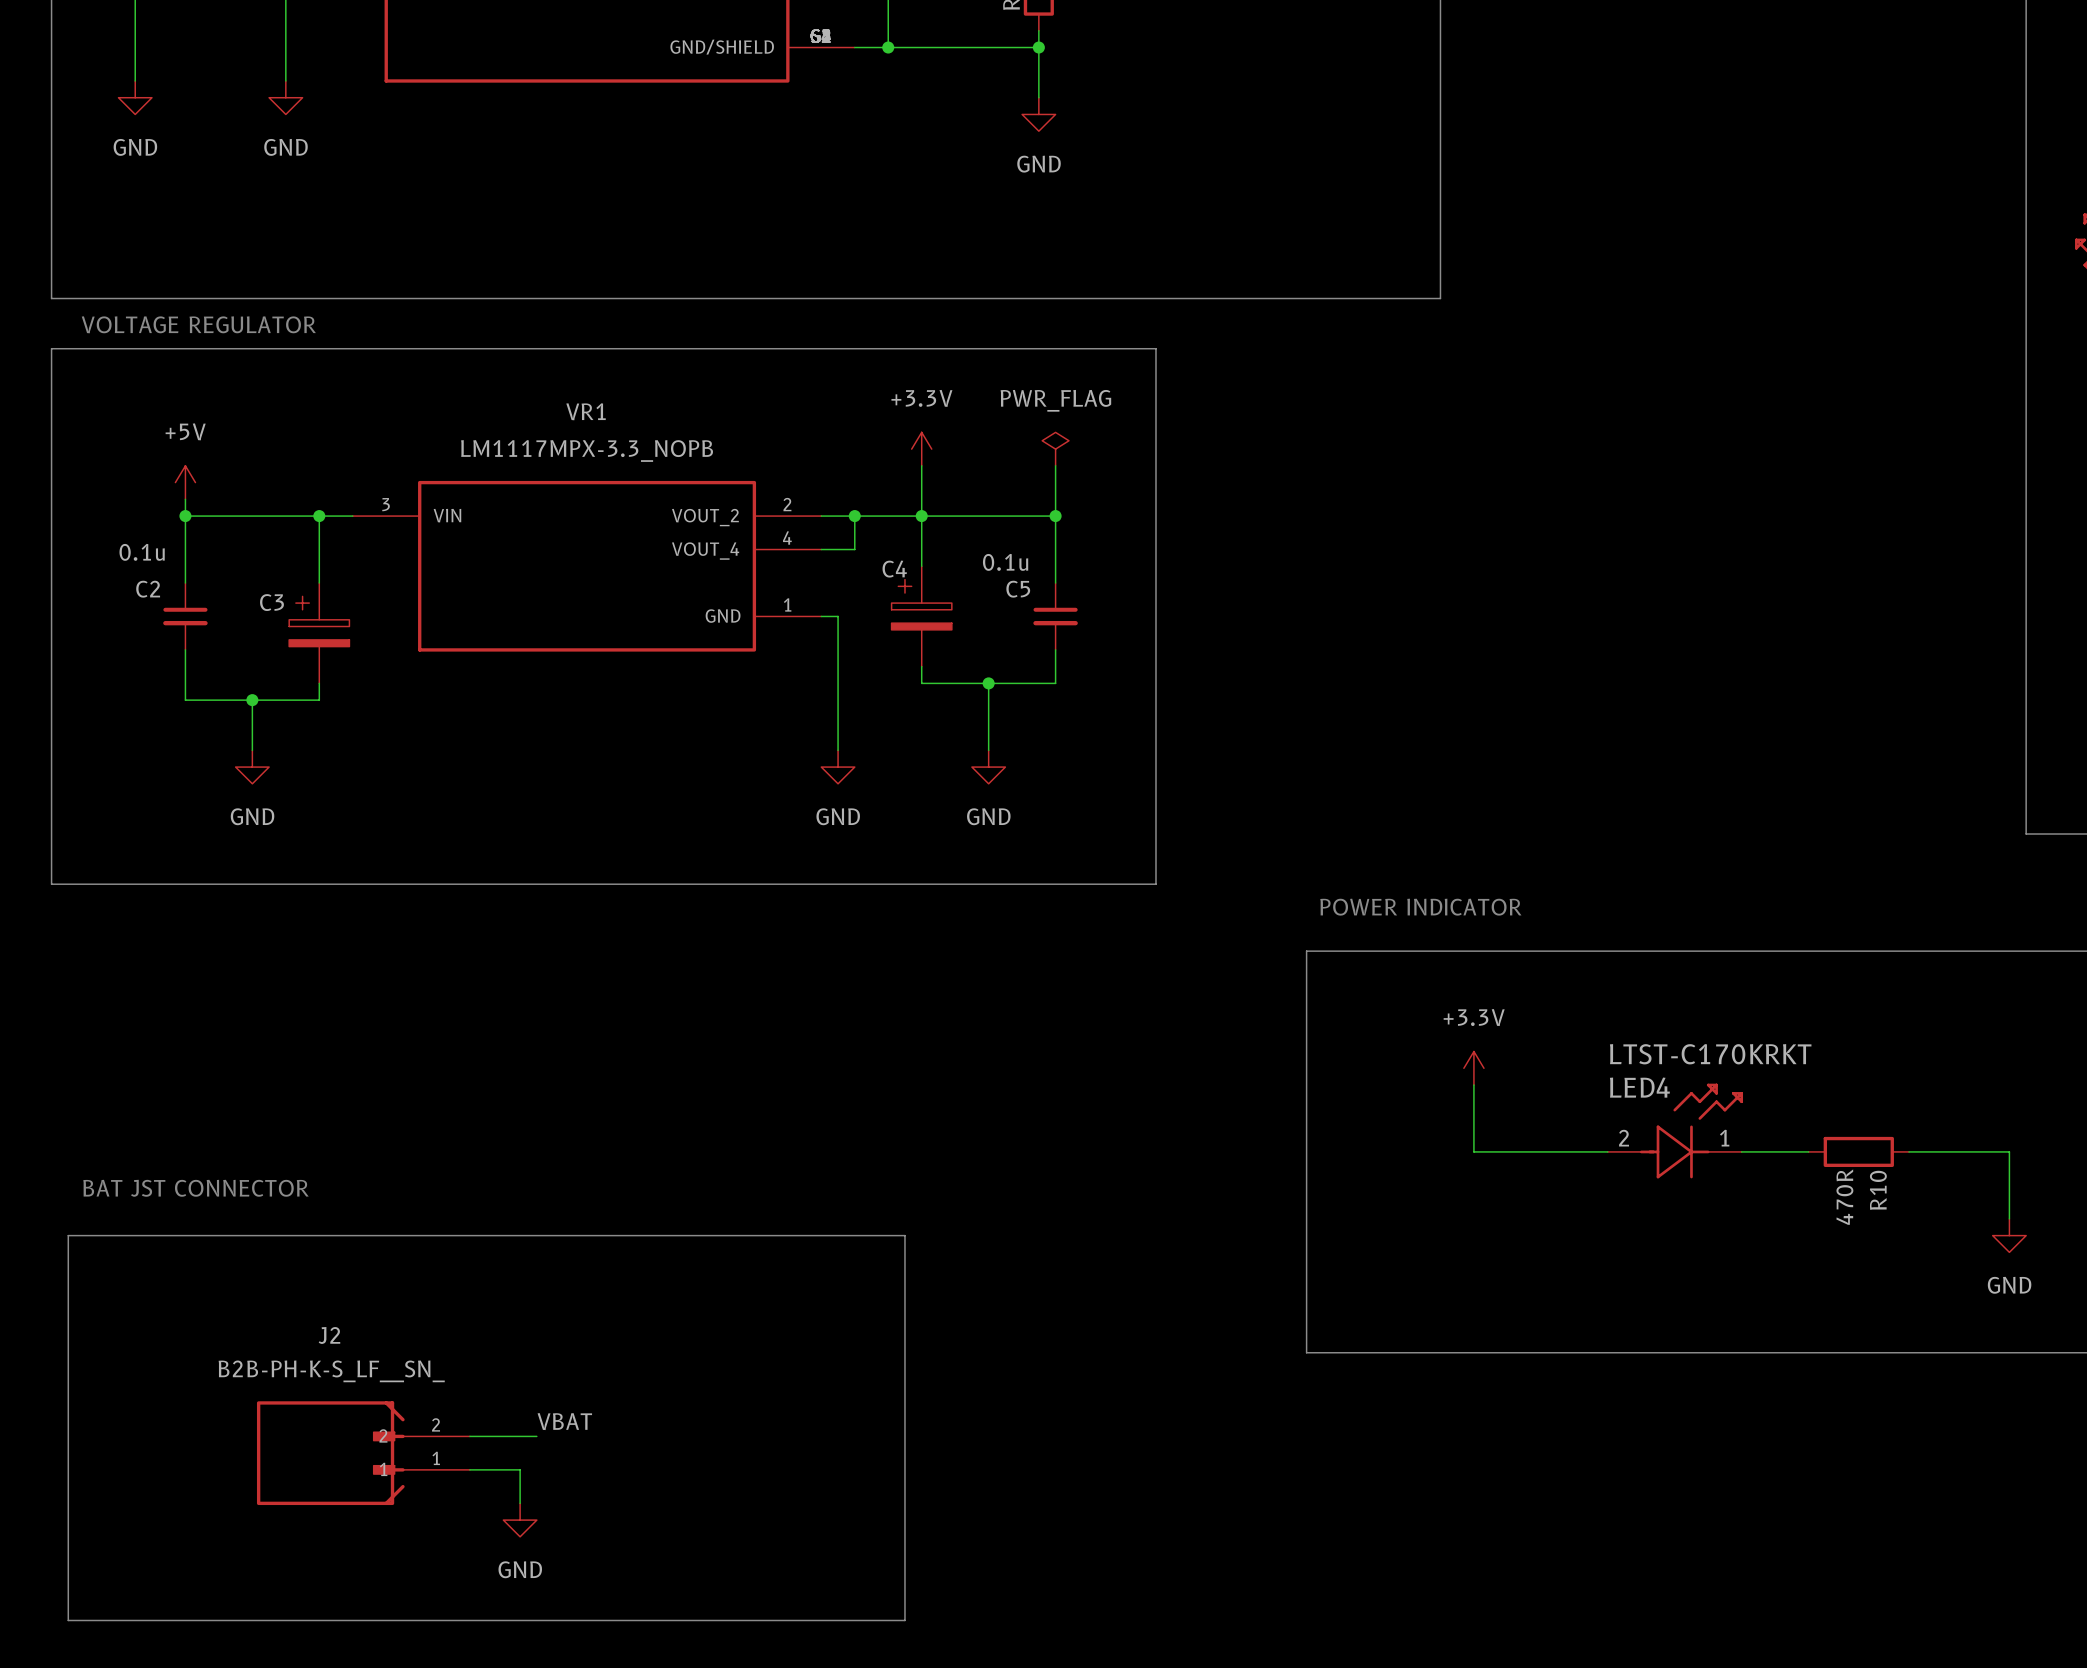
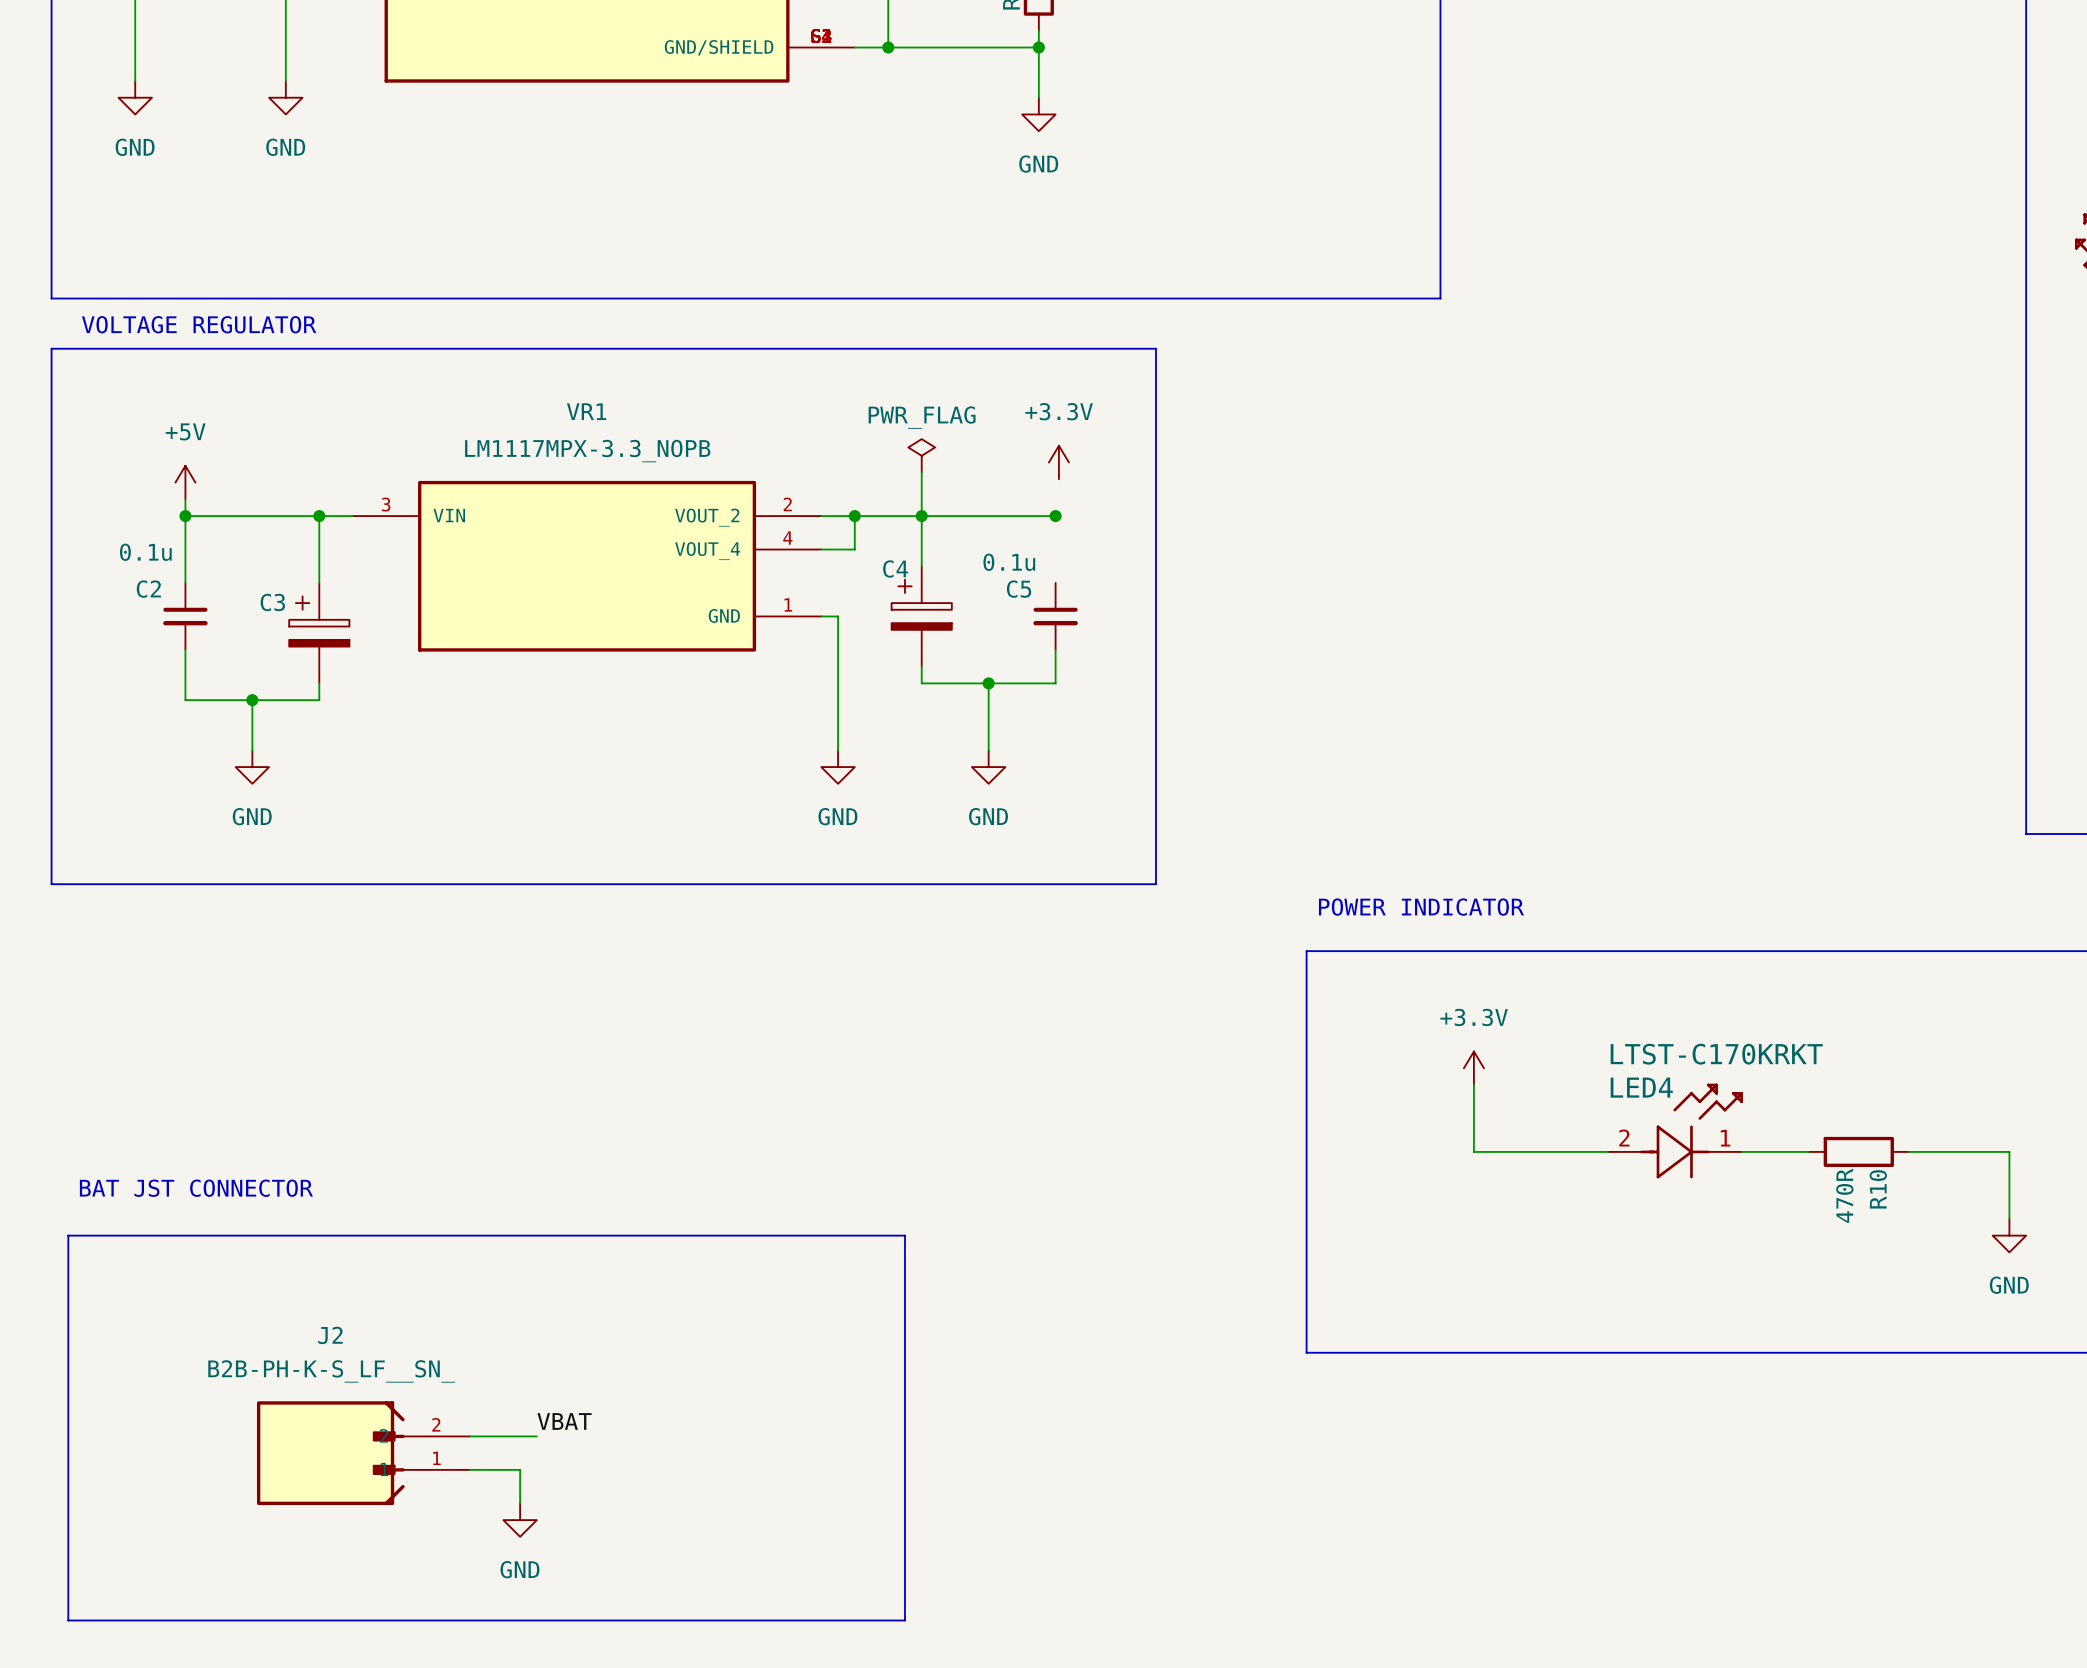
power symbol: +3.3V (921, 449) -> PWR_FLAG (921, 455)
power symbol: PWR_FLAG (1055, 449) -> none
power symbol: none -> +3.3V (1058, 462)
wire: (1055, 465) (1055, 583) -> none

